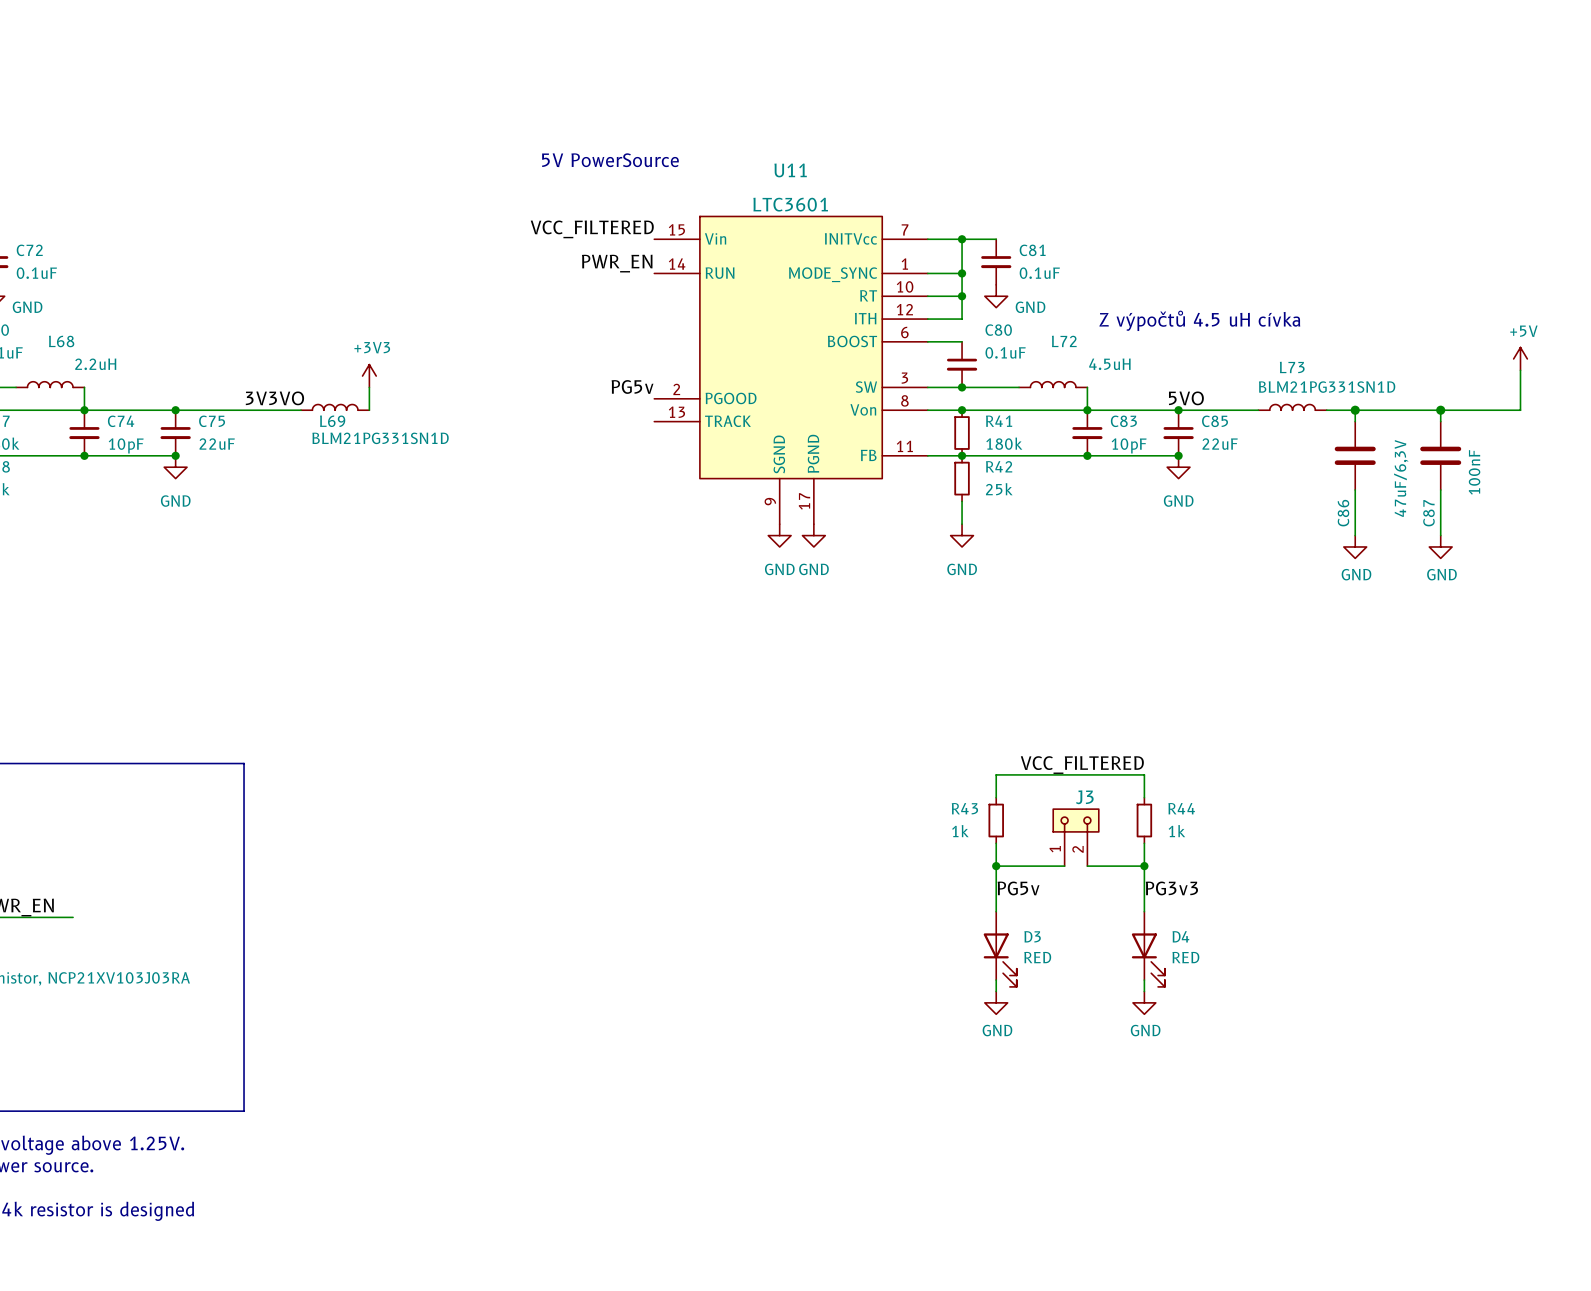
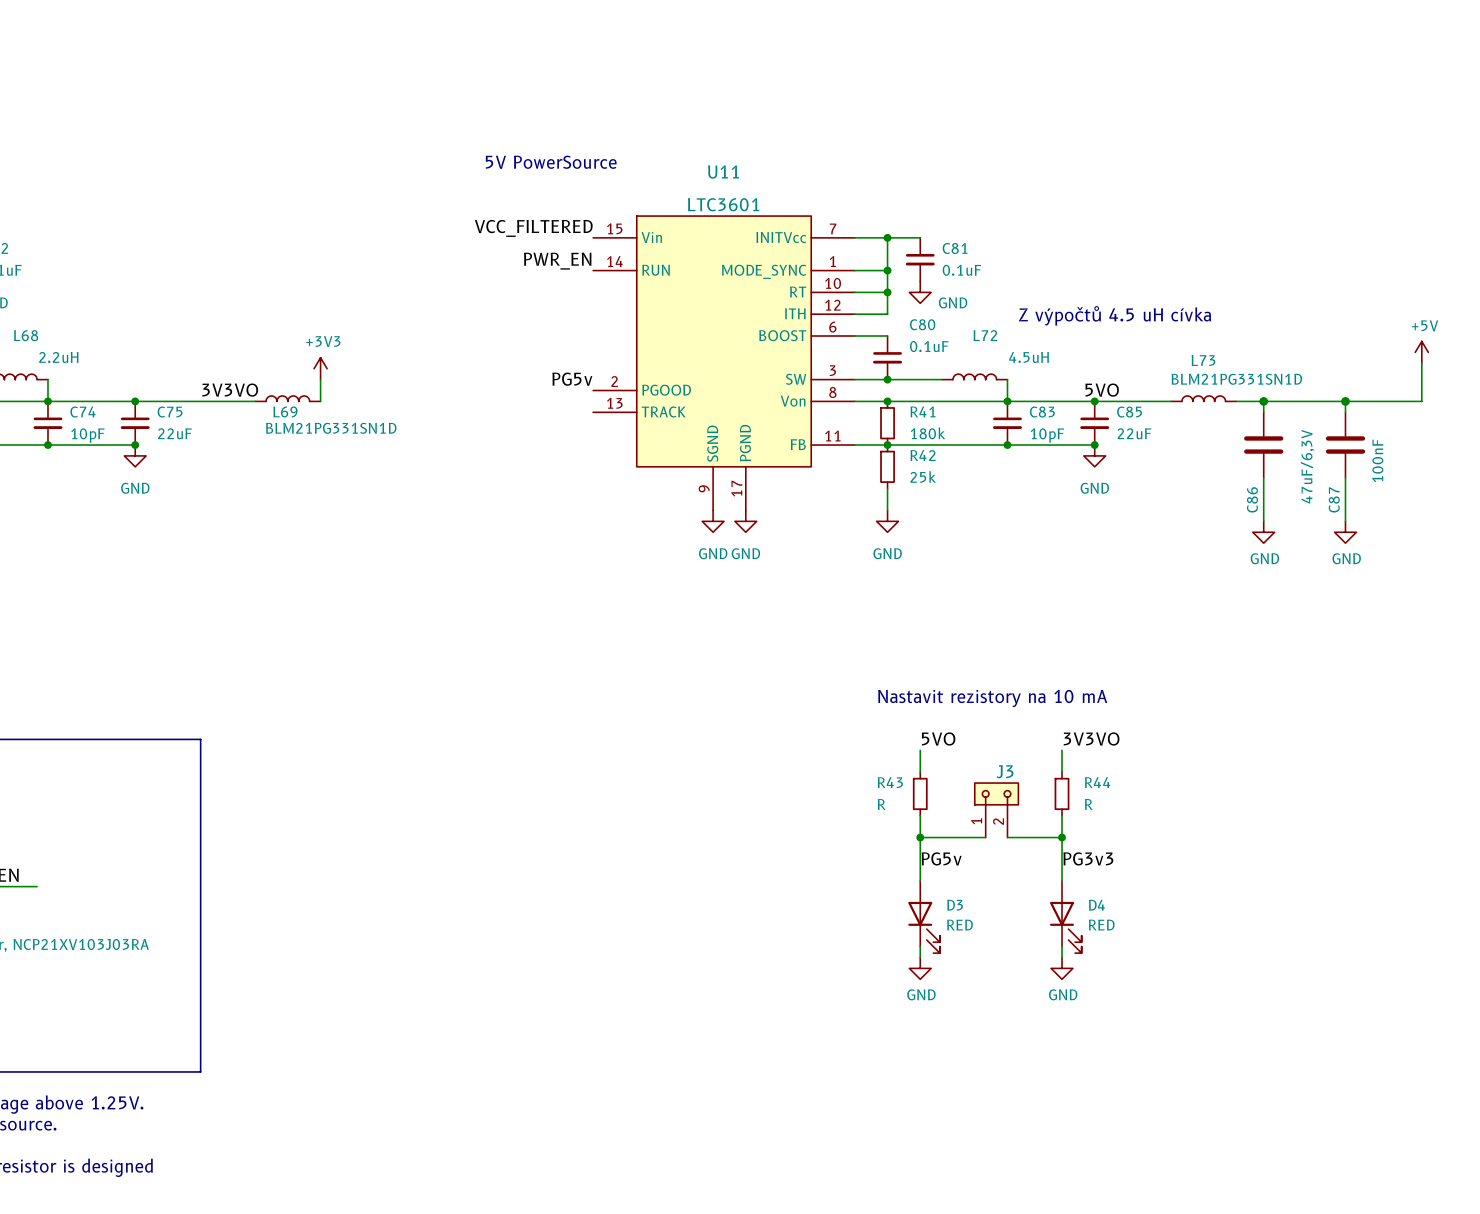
text: none -> Nastavit rezistory na 10 mA (992, 698)
label: none -> 5VO (938, 738)
label: VCC_FILTERED (1082, 765) -> 3V3VO (1091, 738)
wire: (996, 774) (1144, 774) -> none
R43 value: 1k (960, 831) -> R (881, 804)
R44 value: 1k (1176, 831) -> R (1088, 804)

